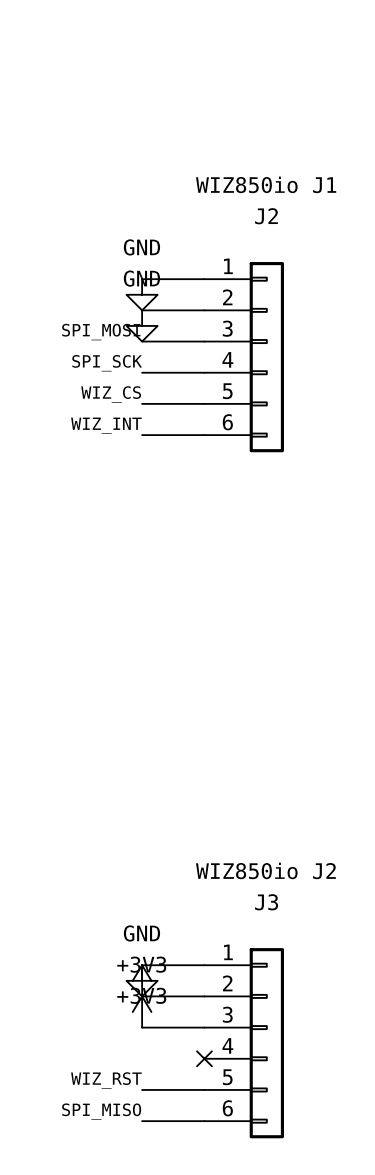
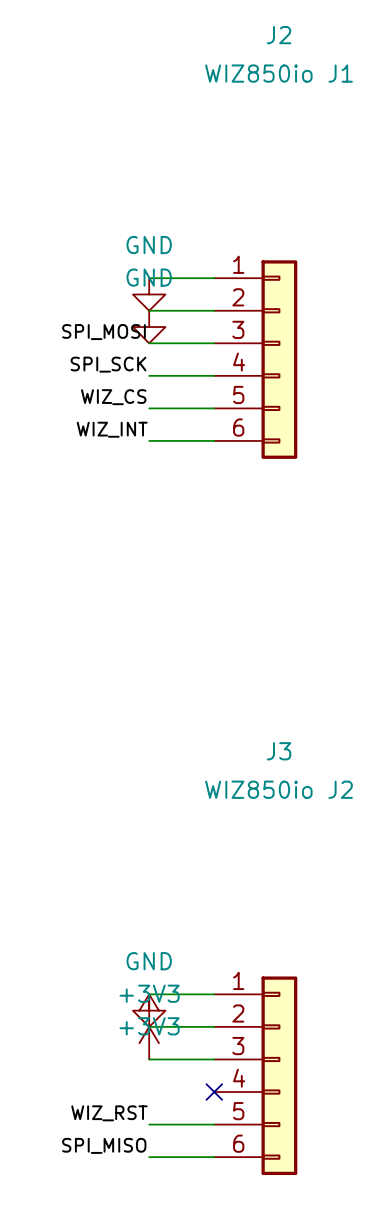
J2 value position: WIZ850io J1 (266, 184) -> WIZ850io J1 (279, 73)
J2 name position: J2 (266, 216) -> J2 (279, 35)
J3 value position: WIZ850io J2 (265, 870) -> WIZ850io J2 (279, 789)
J3 name position: J3 (266, 902) -> J3 (279, 751)

